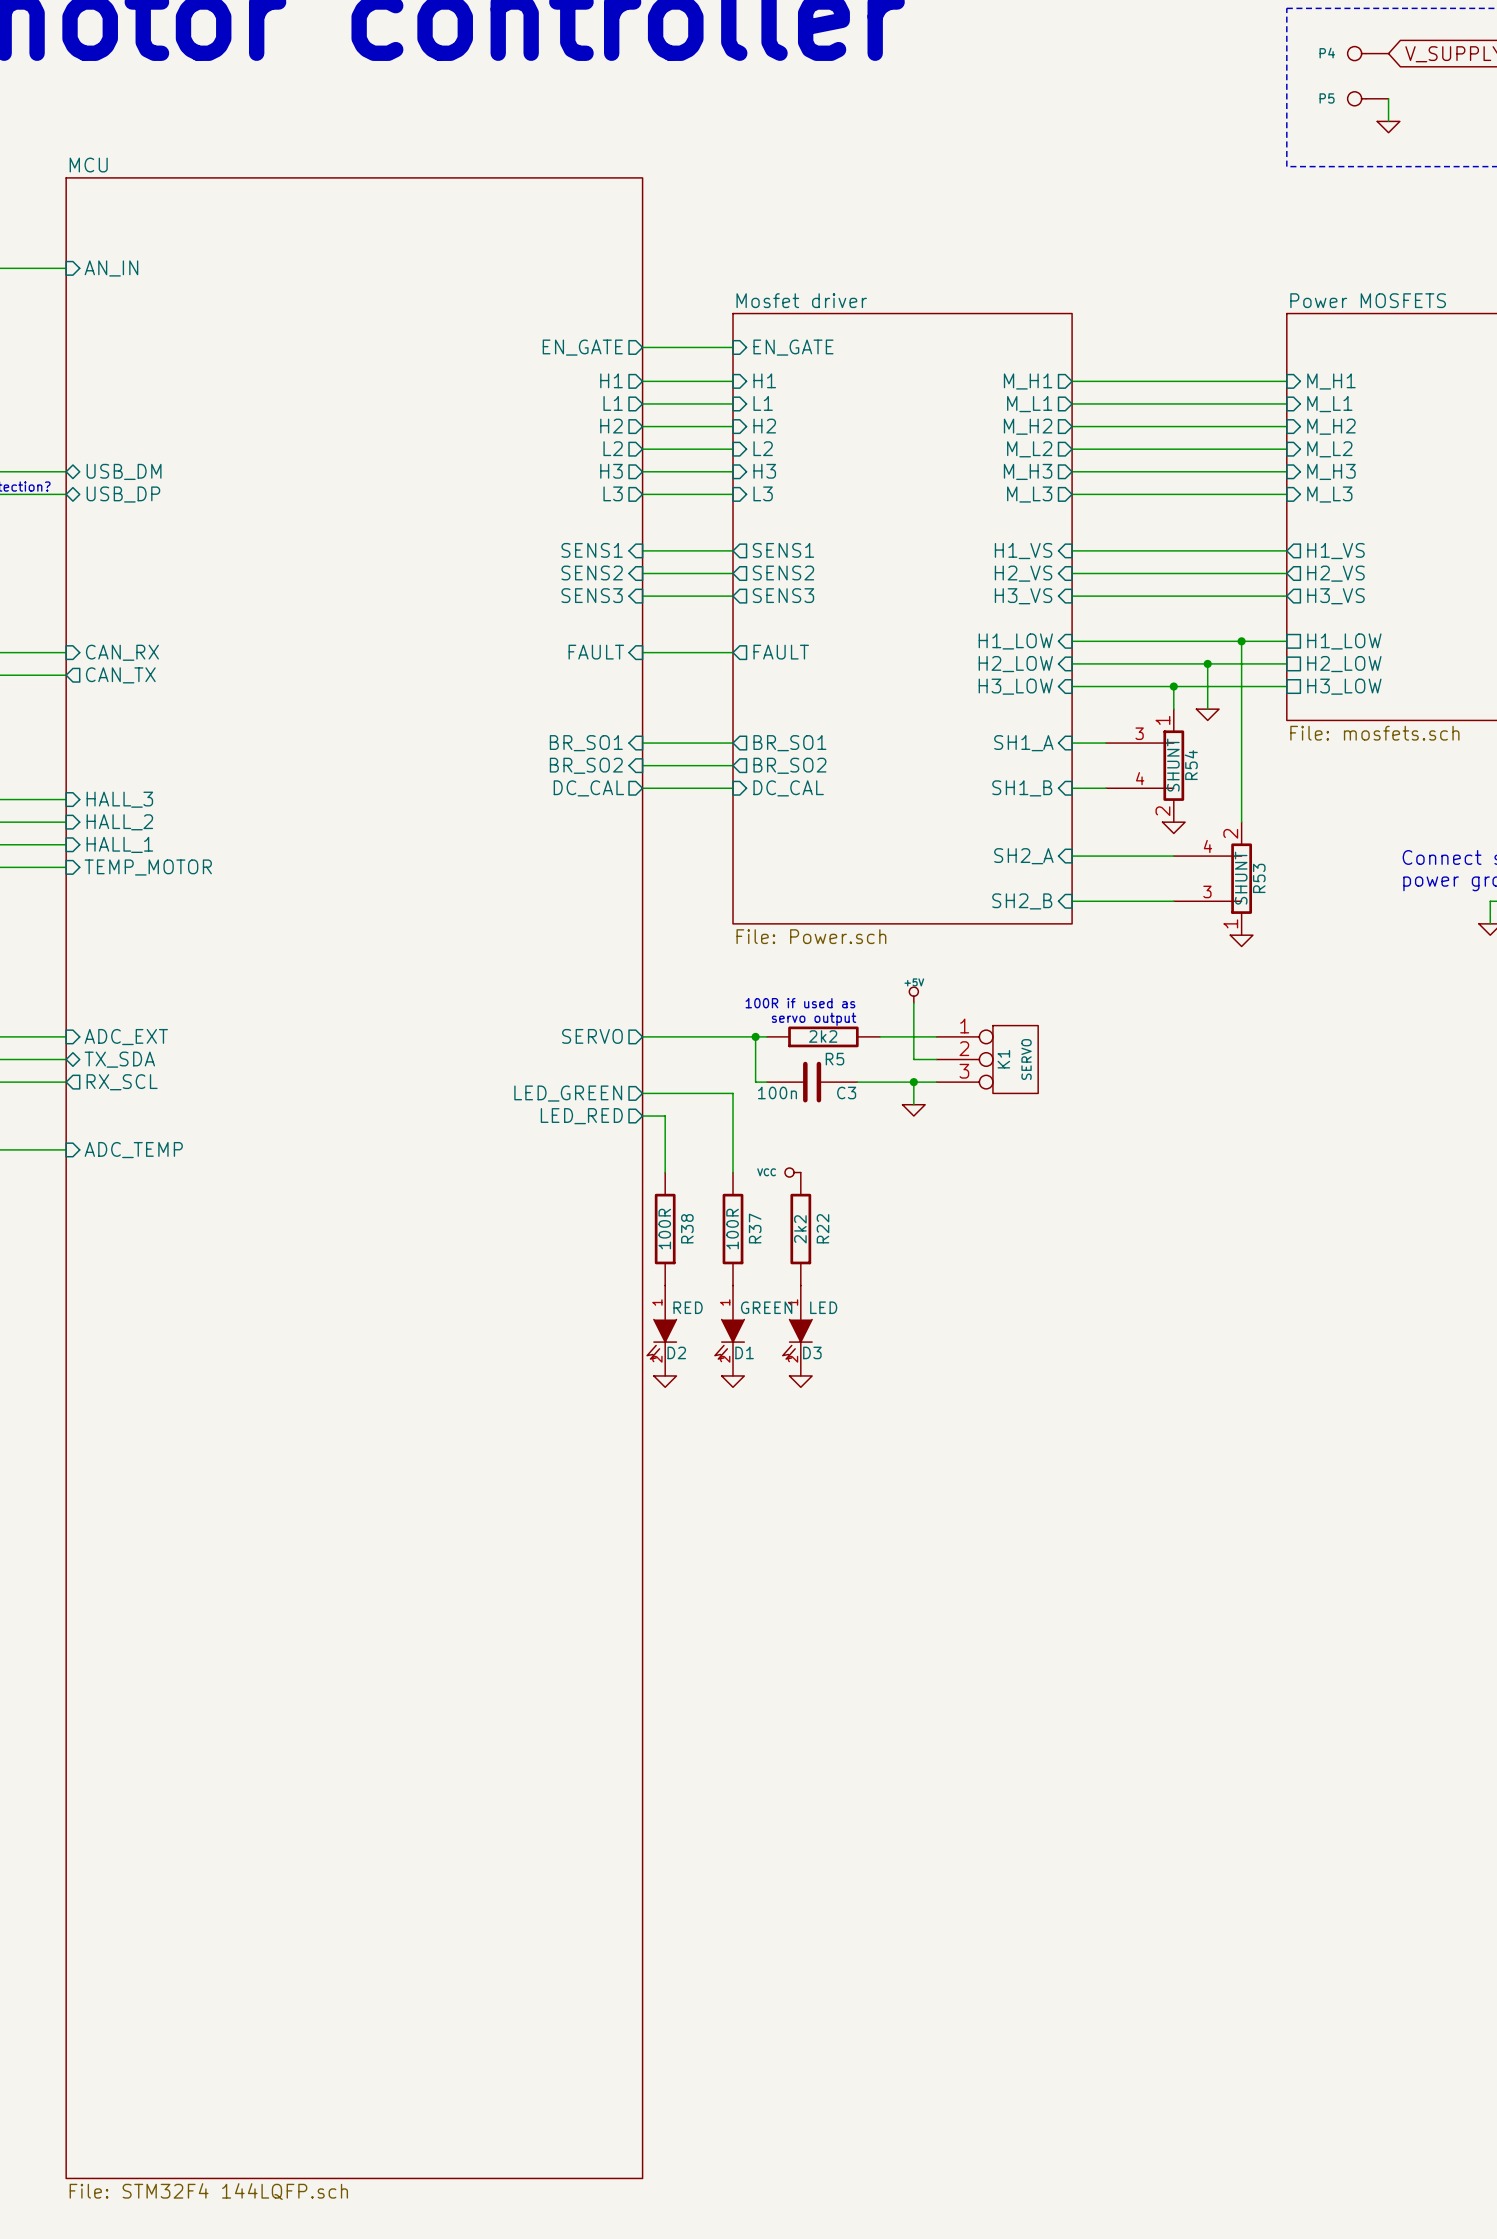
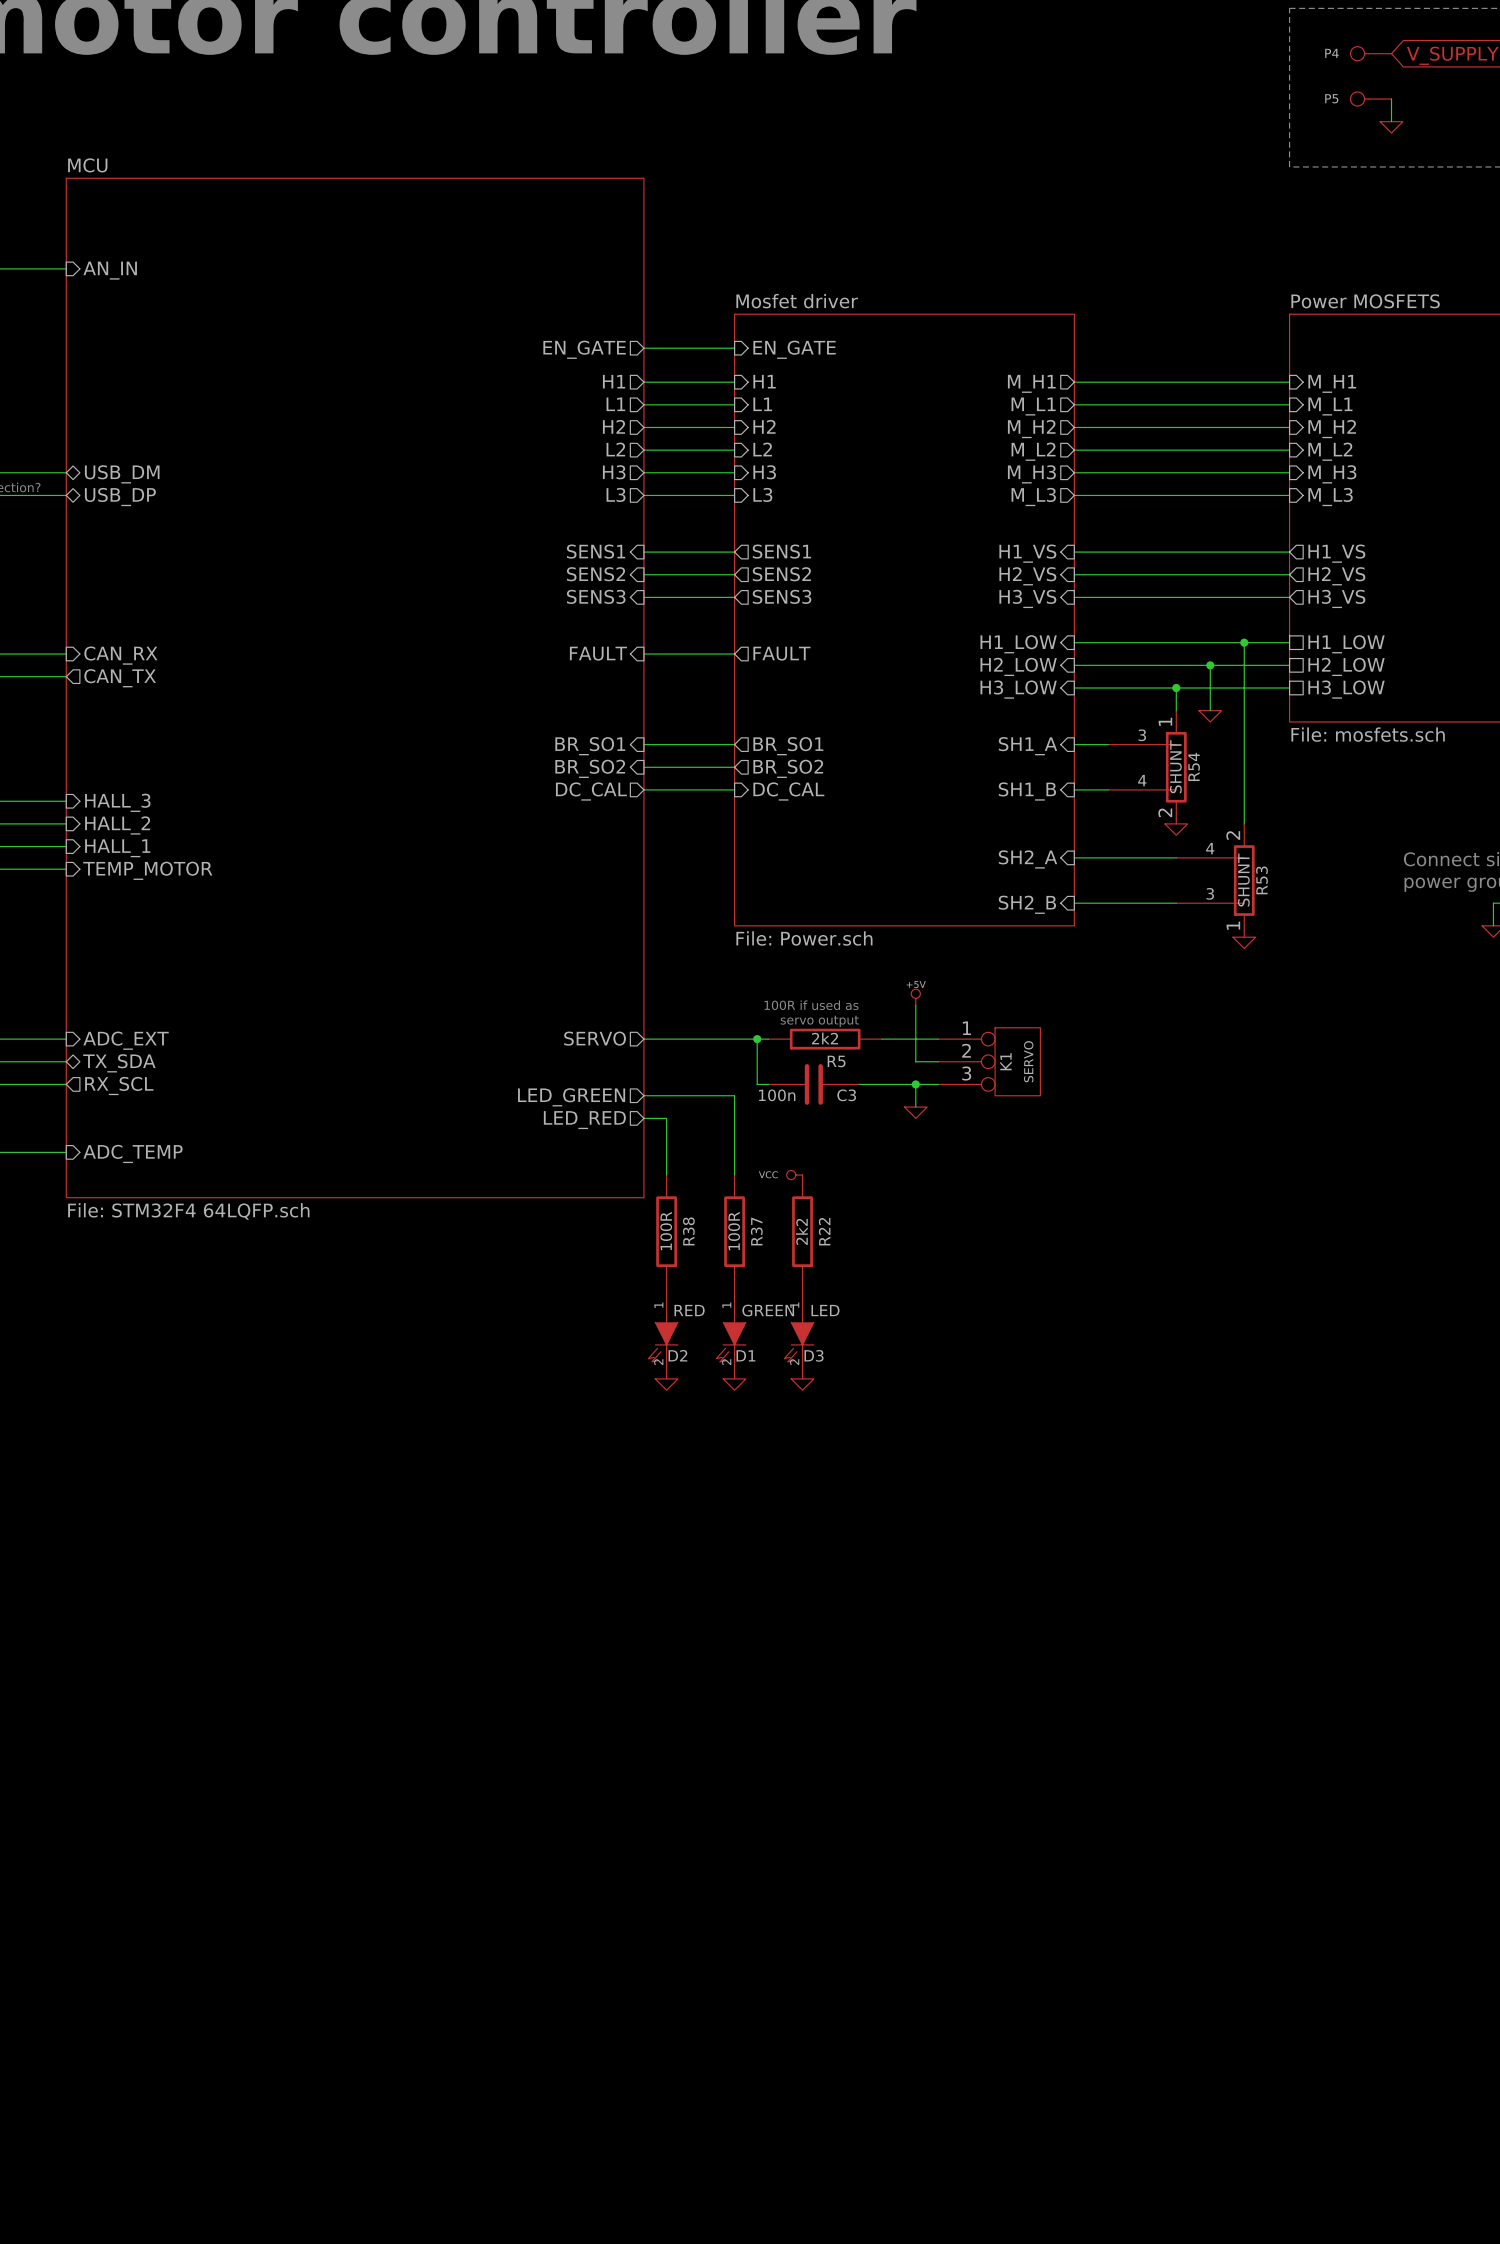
sheet MCU: none -> File: STM32F4 64LQFP.sch (355, 687)
sheet MCU: File: STM32F4 144LQFP.sch (354, 1178) -> none

